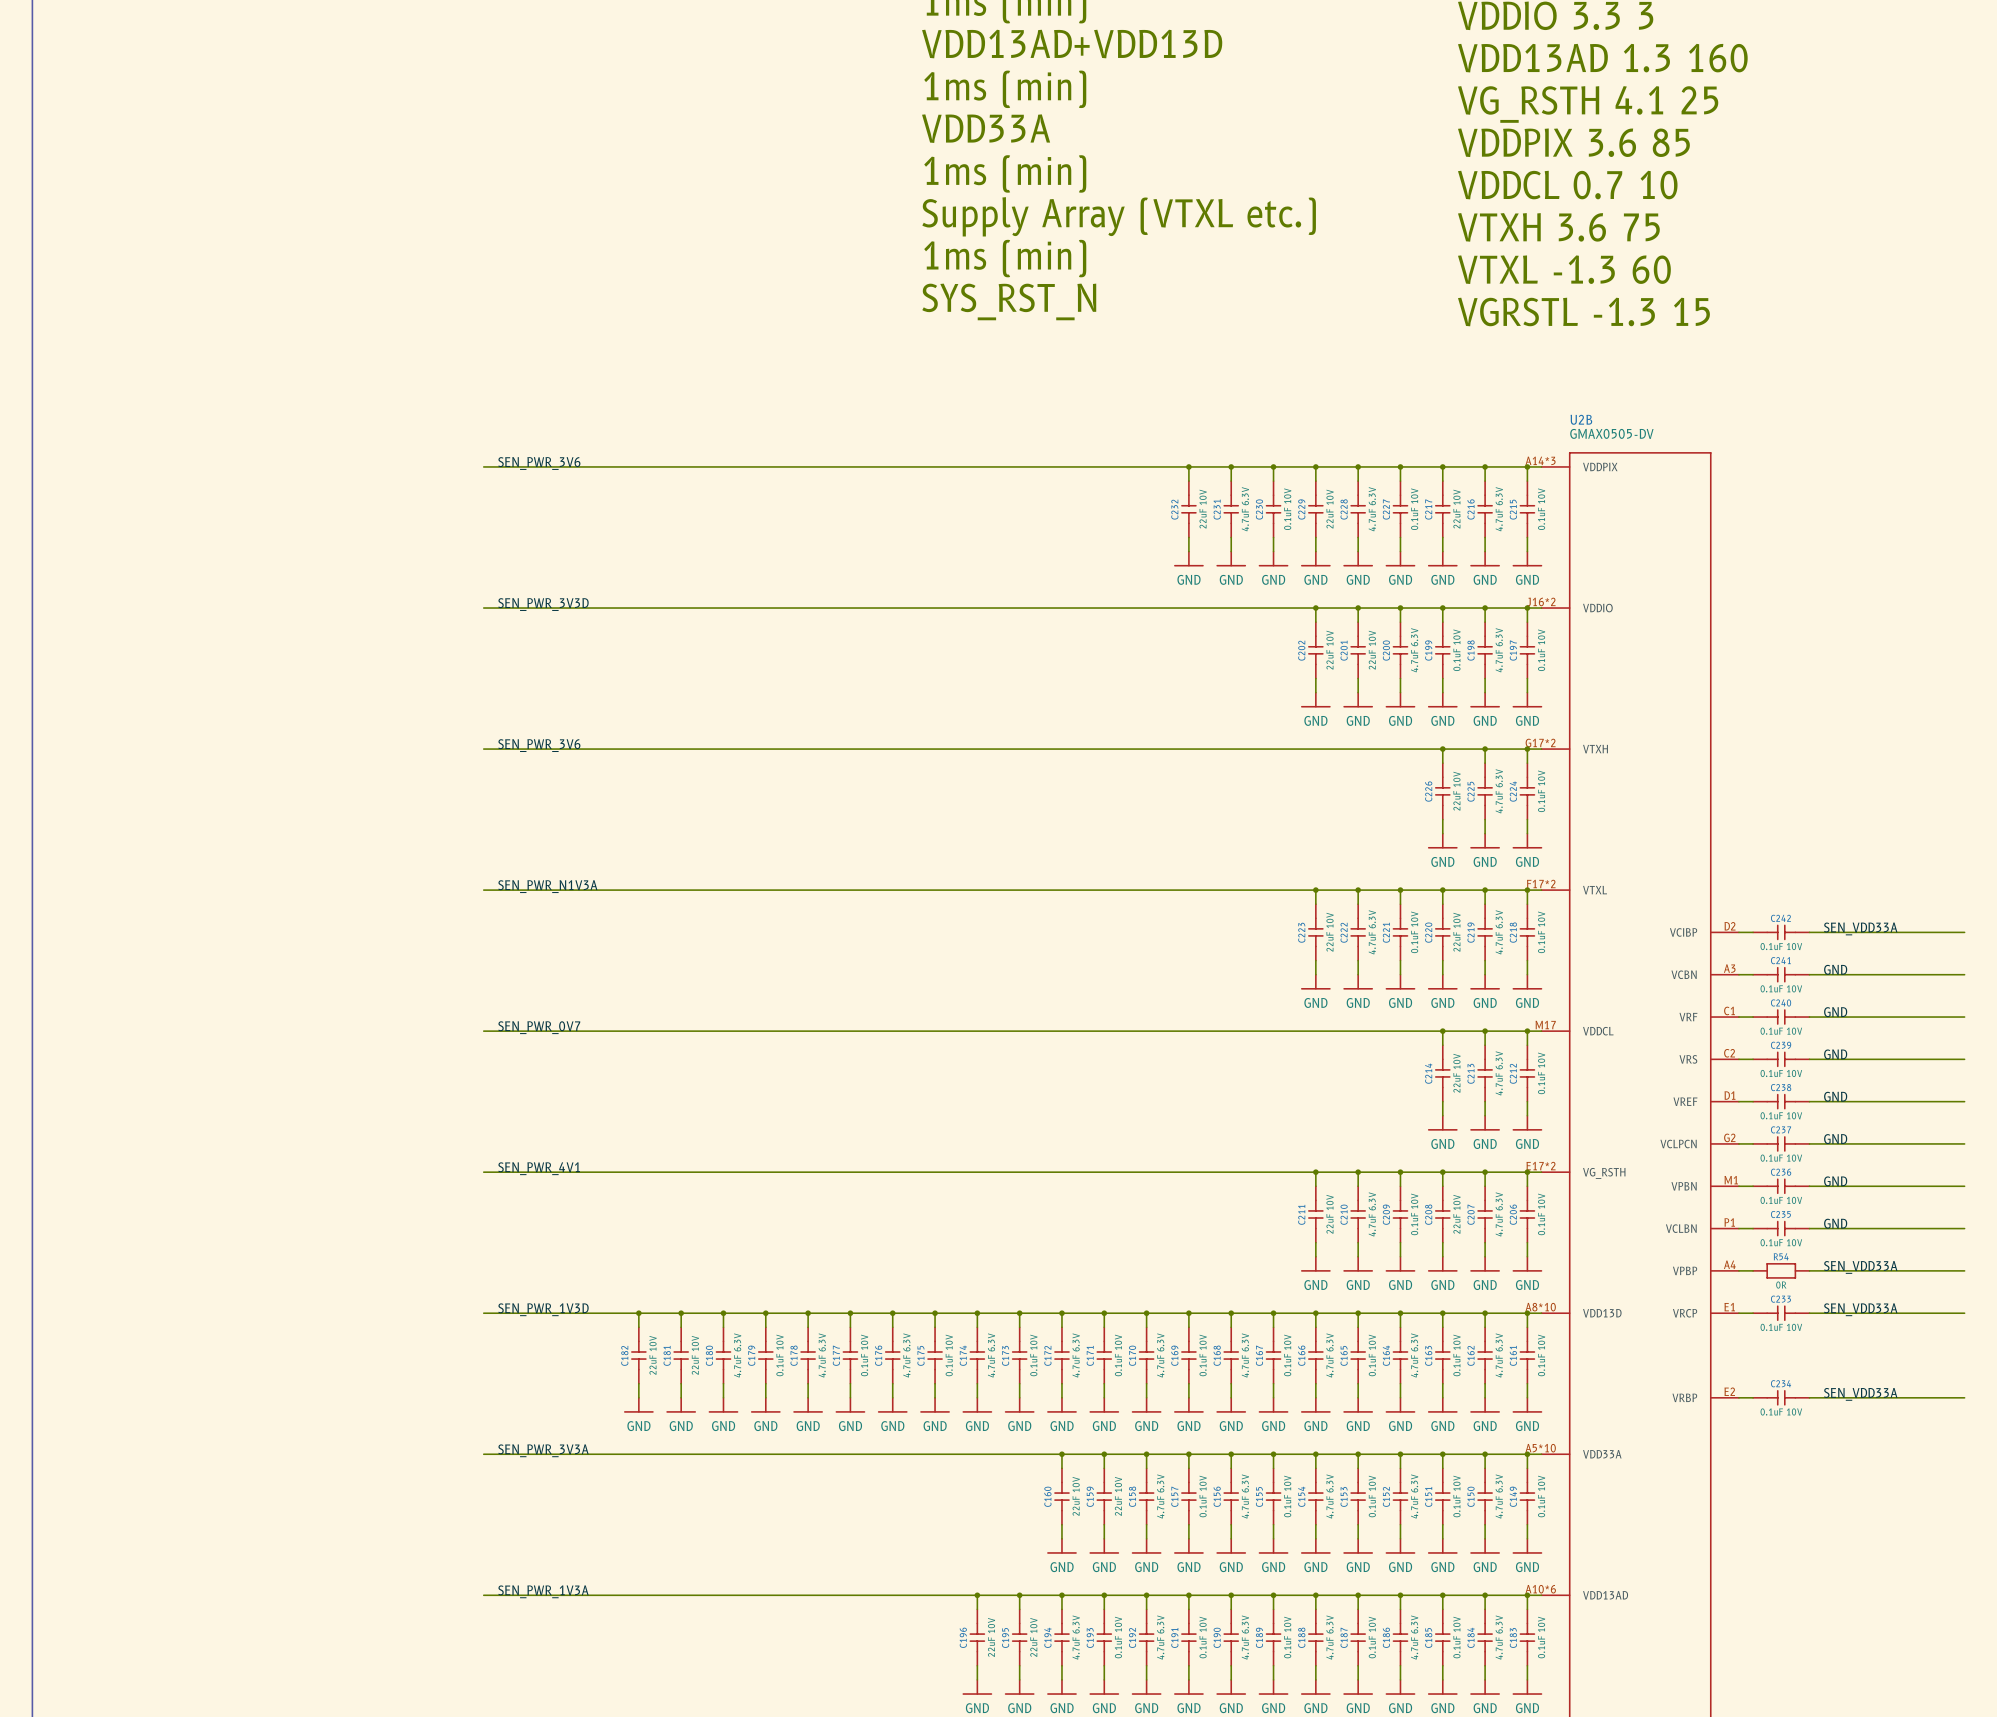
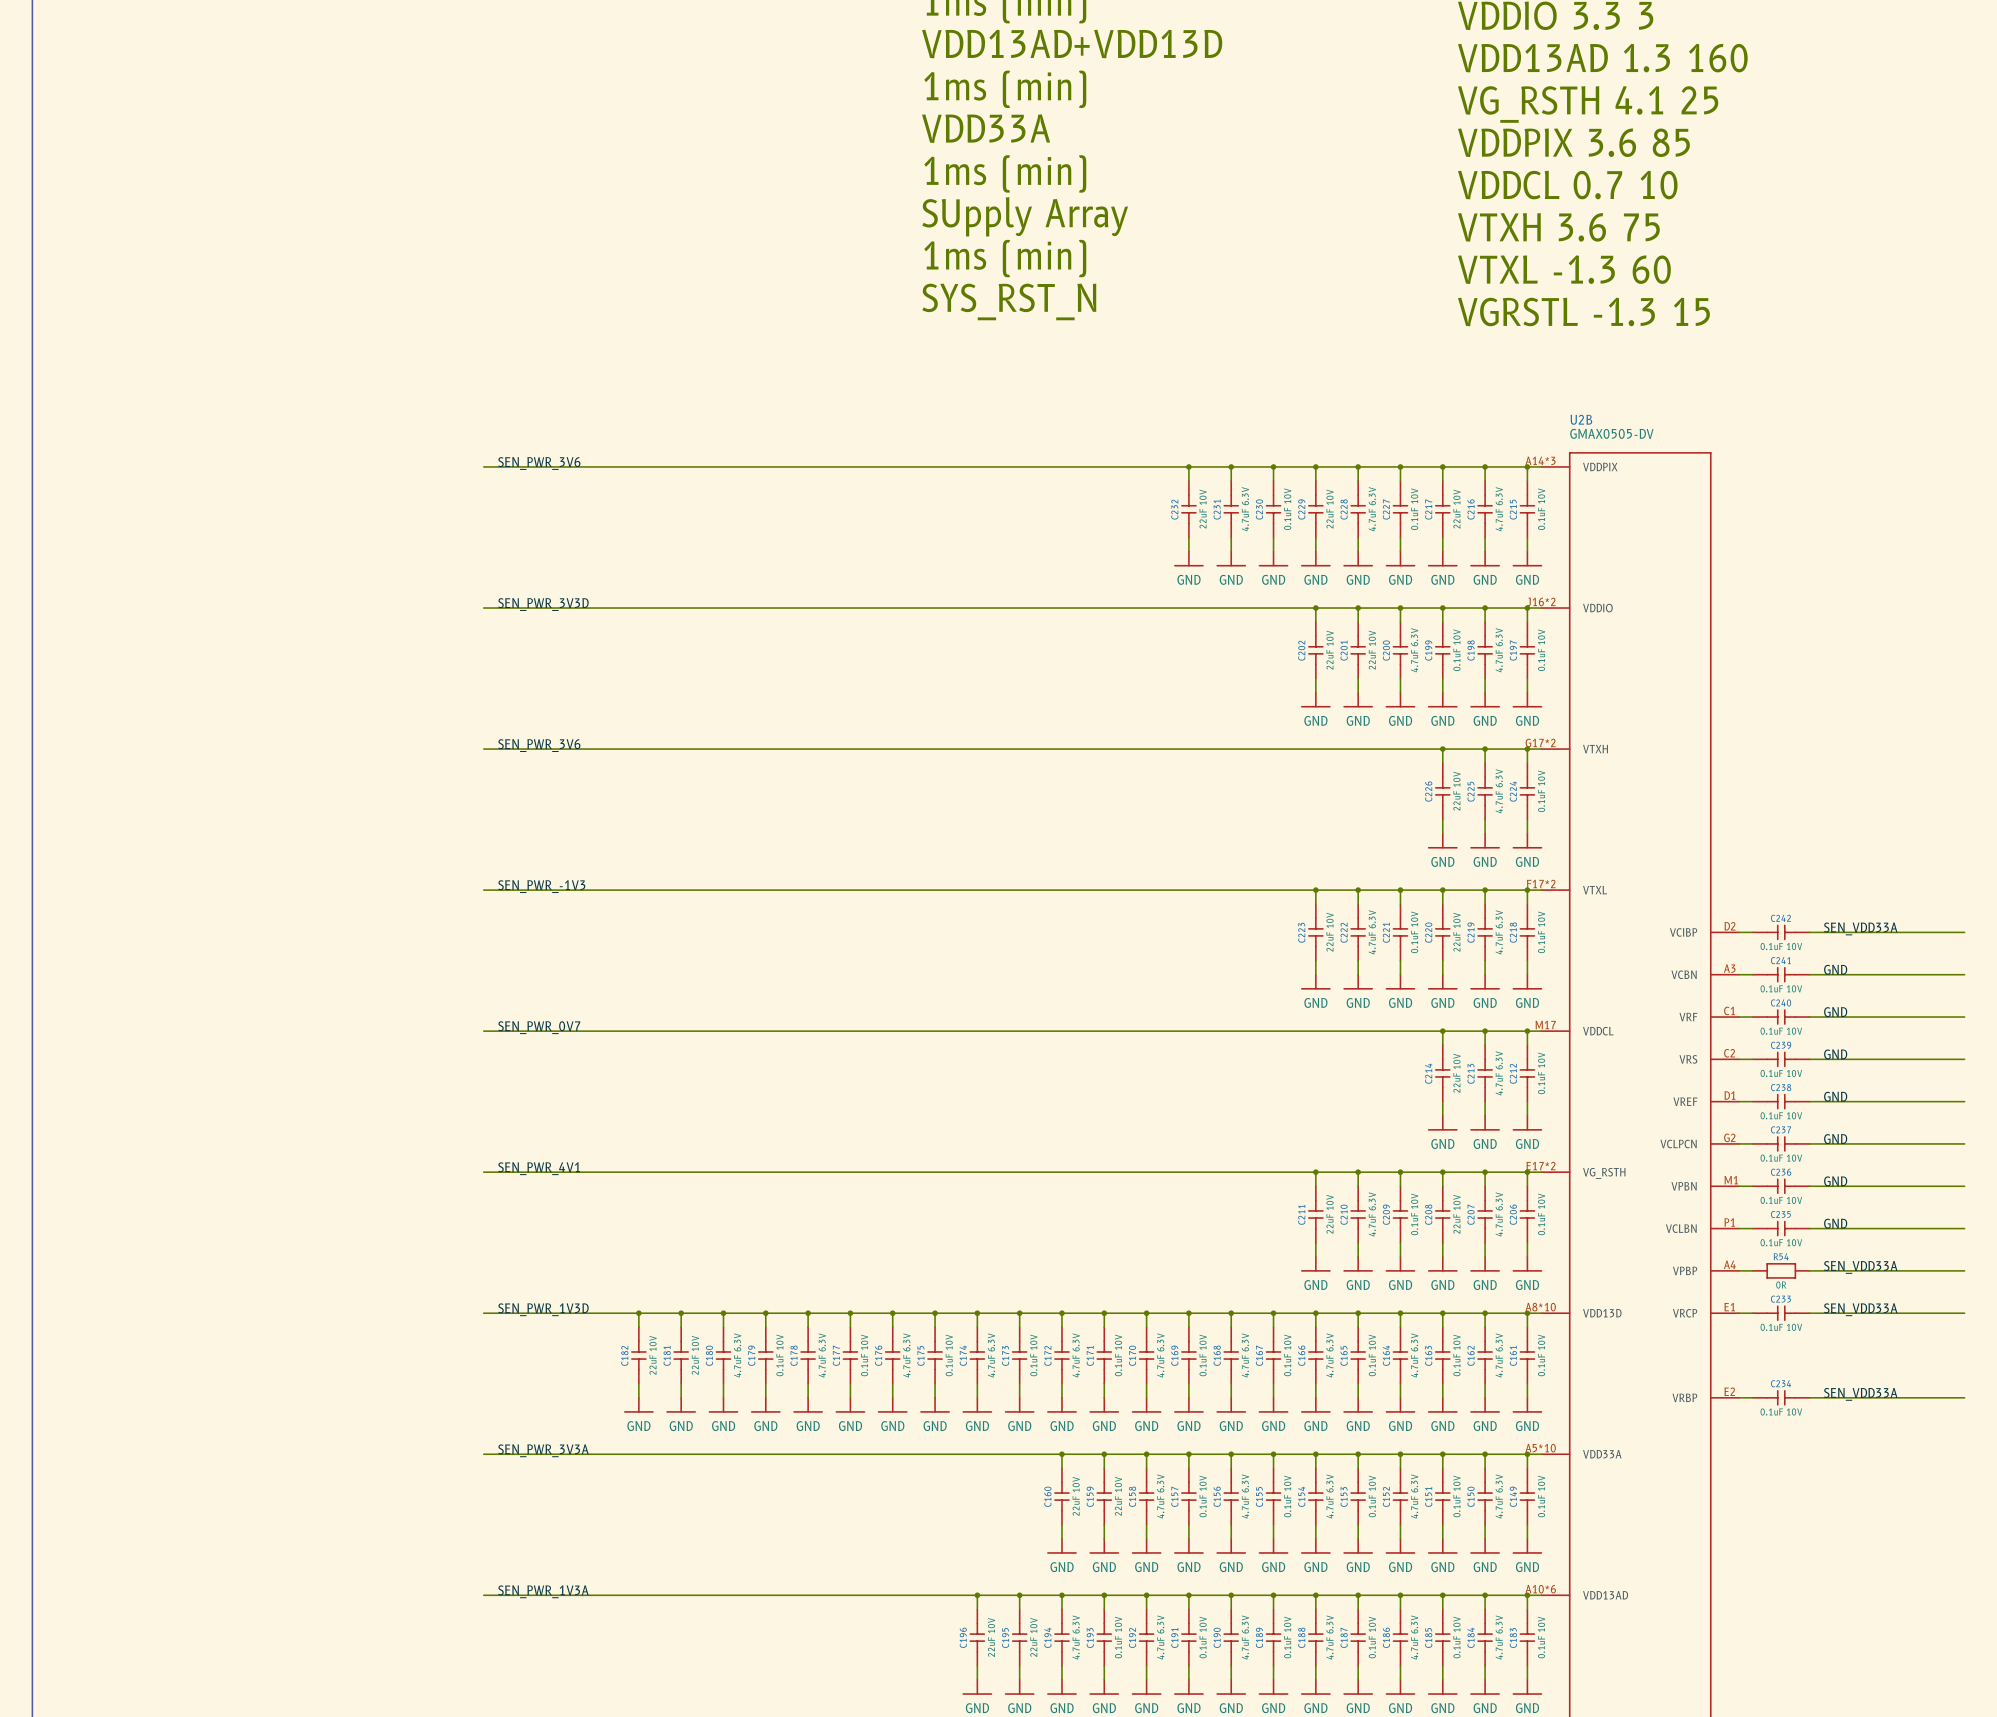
text: Supply Array (VTXL etc.) (1119, 216) -> SUpply Array (1025, 216)
label: SEN_PWR_N1V3A (547, 886) -> SEN_PWR_-1V3 (541, 886)

